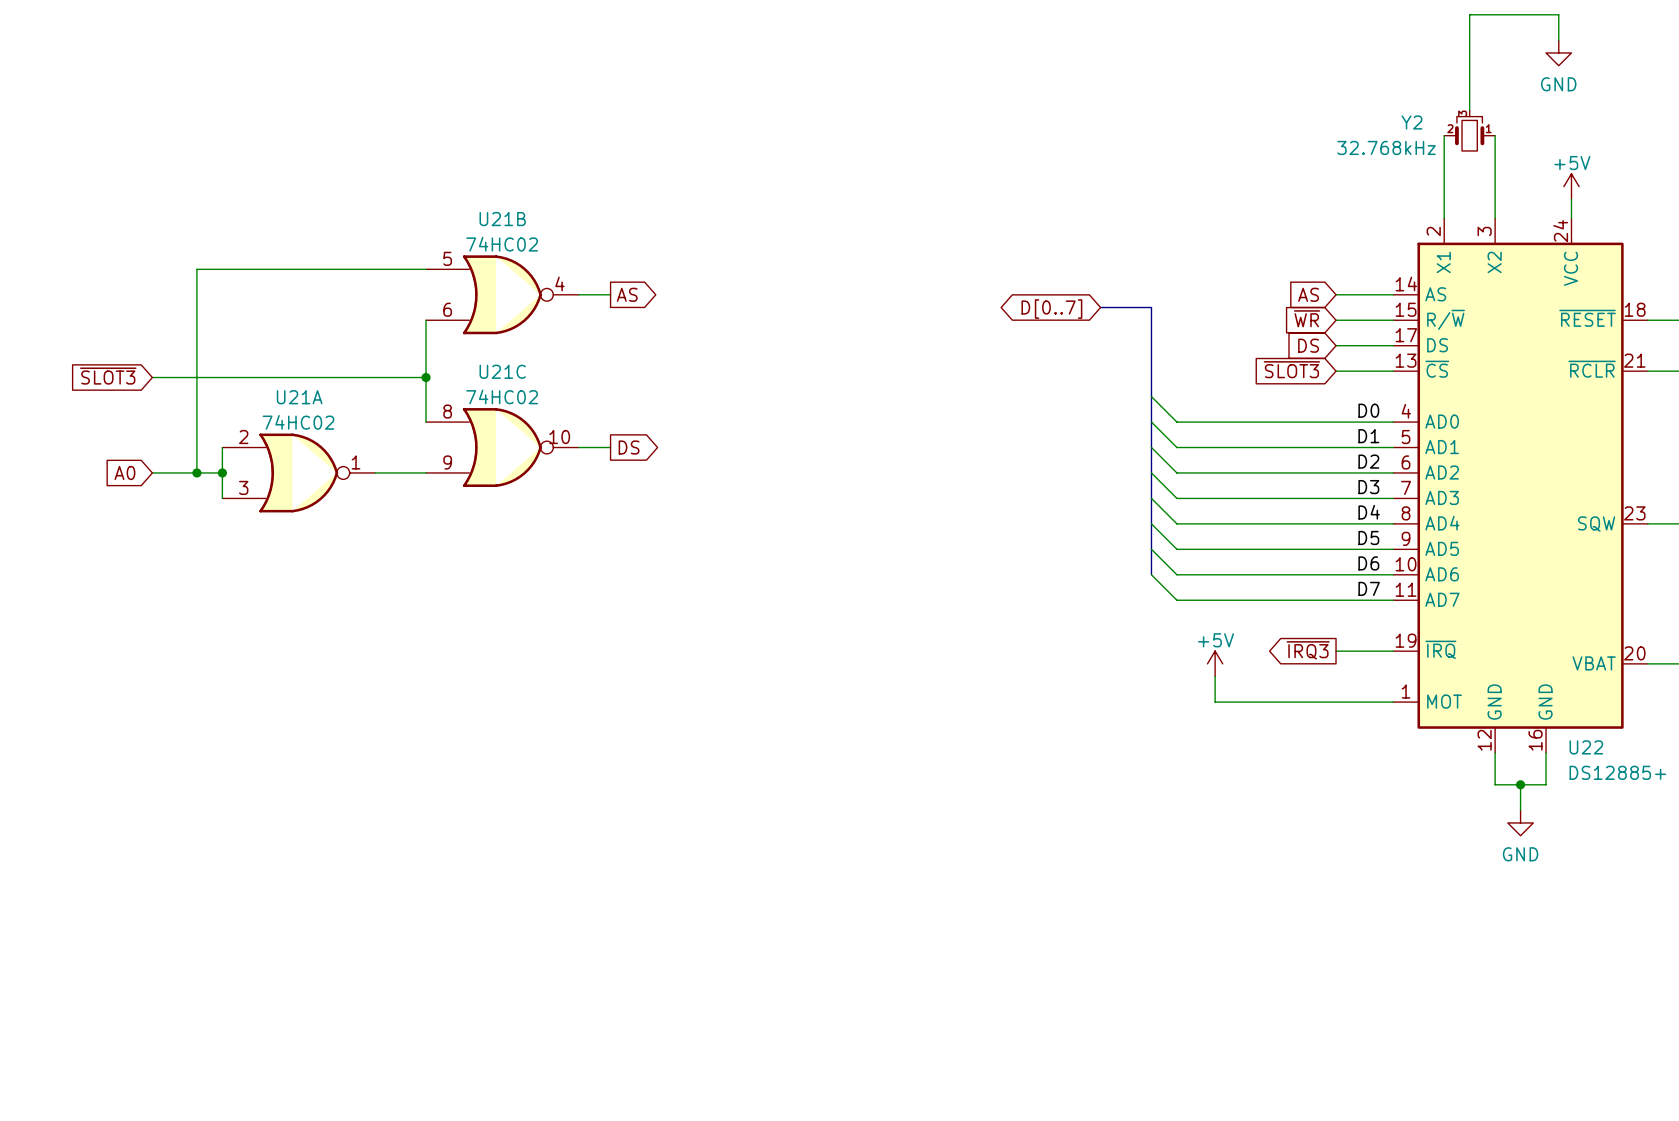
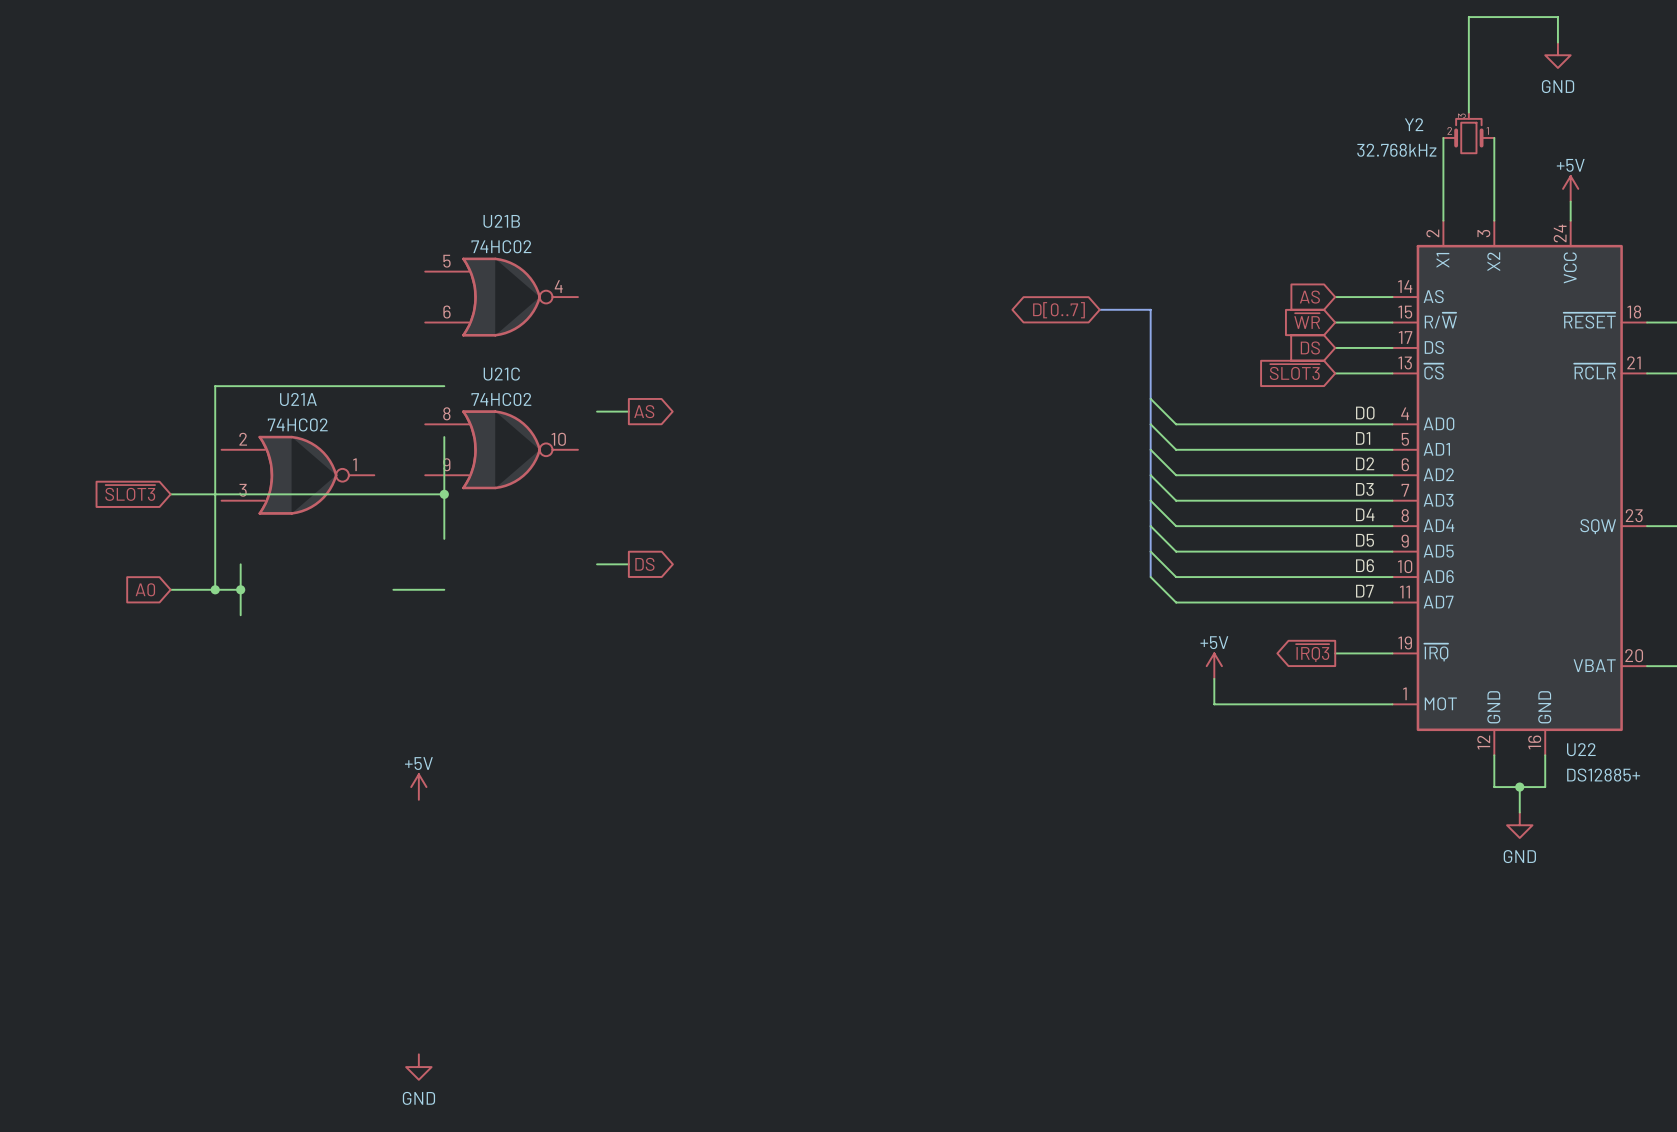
wire: (426, 269) (196, 269) (196, 472) -> (444, 386) (215, 386) (215, 589)
wire: (578, 294) (610, 294) -> (597, 411) (628, 411)
global label position: AS (627, 294) -> AS (644, 411)
wire: (426, 320) (426, 422) -> (444, 437) (444, 538)
global label position: ~{SLOT3} (108, 376) -> ~{SLOT3} (130, 492)
wire: (152, 377) (426, 377) -> (170, 494) (444, 494)
junction: (426, 377) -> none
wire: (222, 447) (222, 498) -> (240, 564) (240, 615)
wire: (578, 447) (610, 447) -> (597, 564) (628, 564)
global label position: DS (629, 447) -> DS (644, 564)
global label position: A0 (124, 472) -> A0 (145, 589)
wire: (152, 472) (222, 472) -> (170, 589) (240, 589)
junction: (196, 472) -> none
junction: (222, 472) -> none
wire: (375, 472) (426, 472) -> (393, 589) (444, 589)
junction: none -> (444, 494)
junction: none -> (215, 589)
junction: none -> (240, 589)
power symbol: none -> +5V (418, 787)
power symbol: none -> GND (418, 1067)

